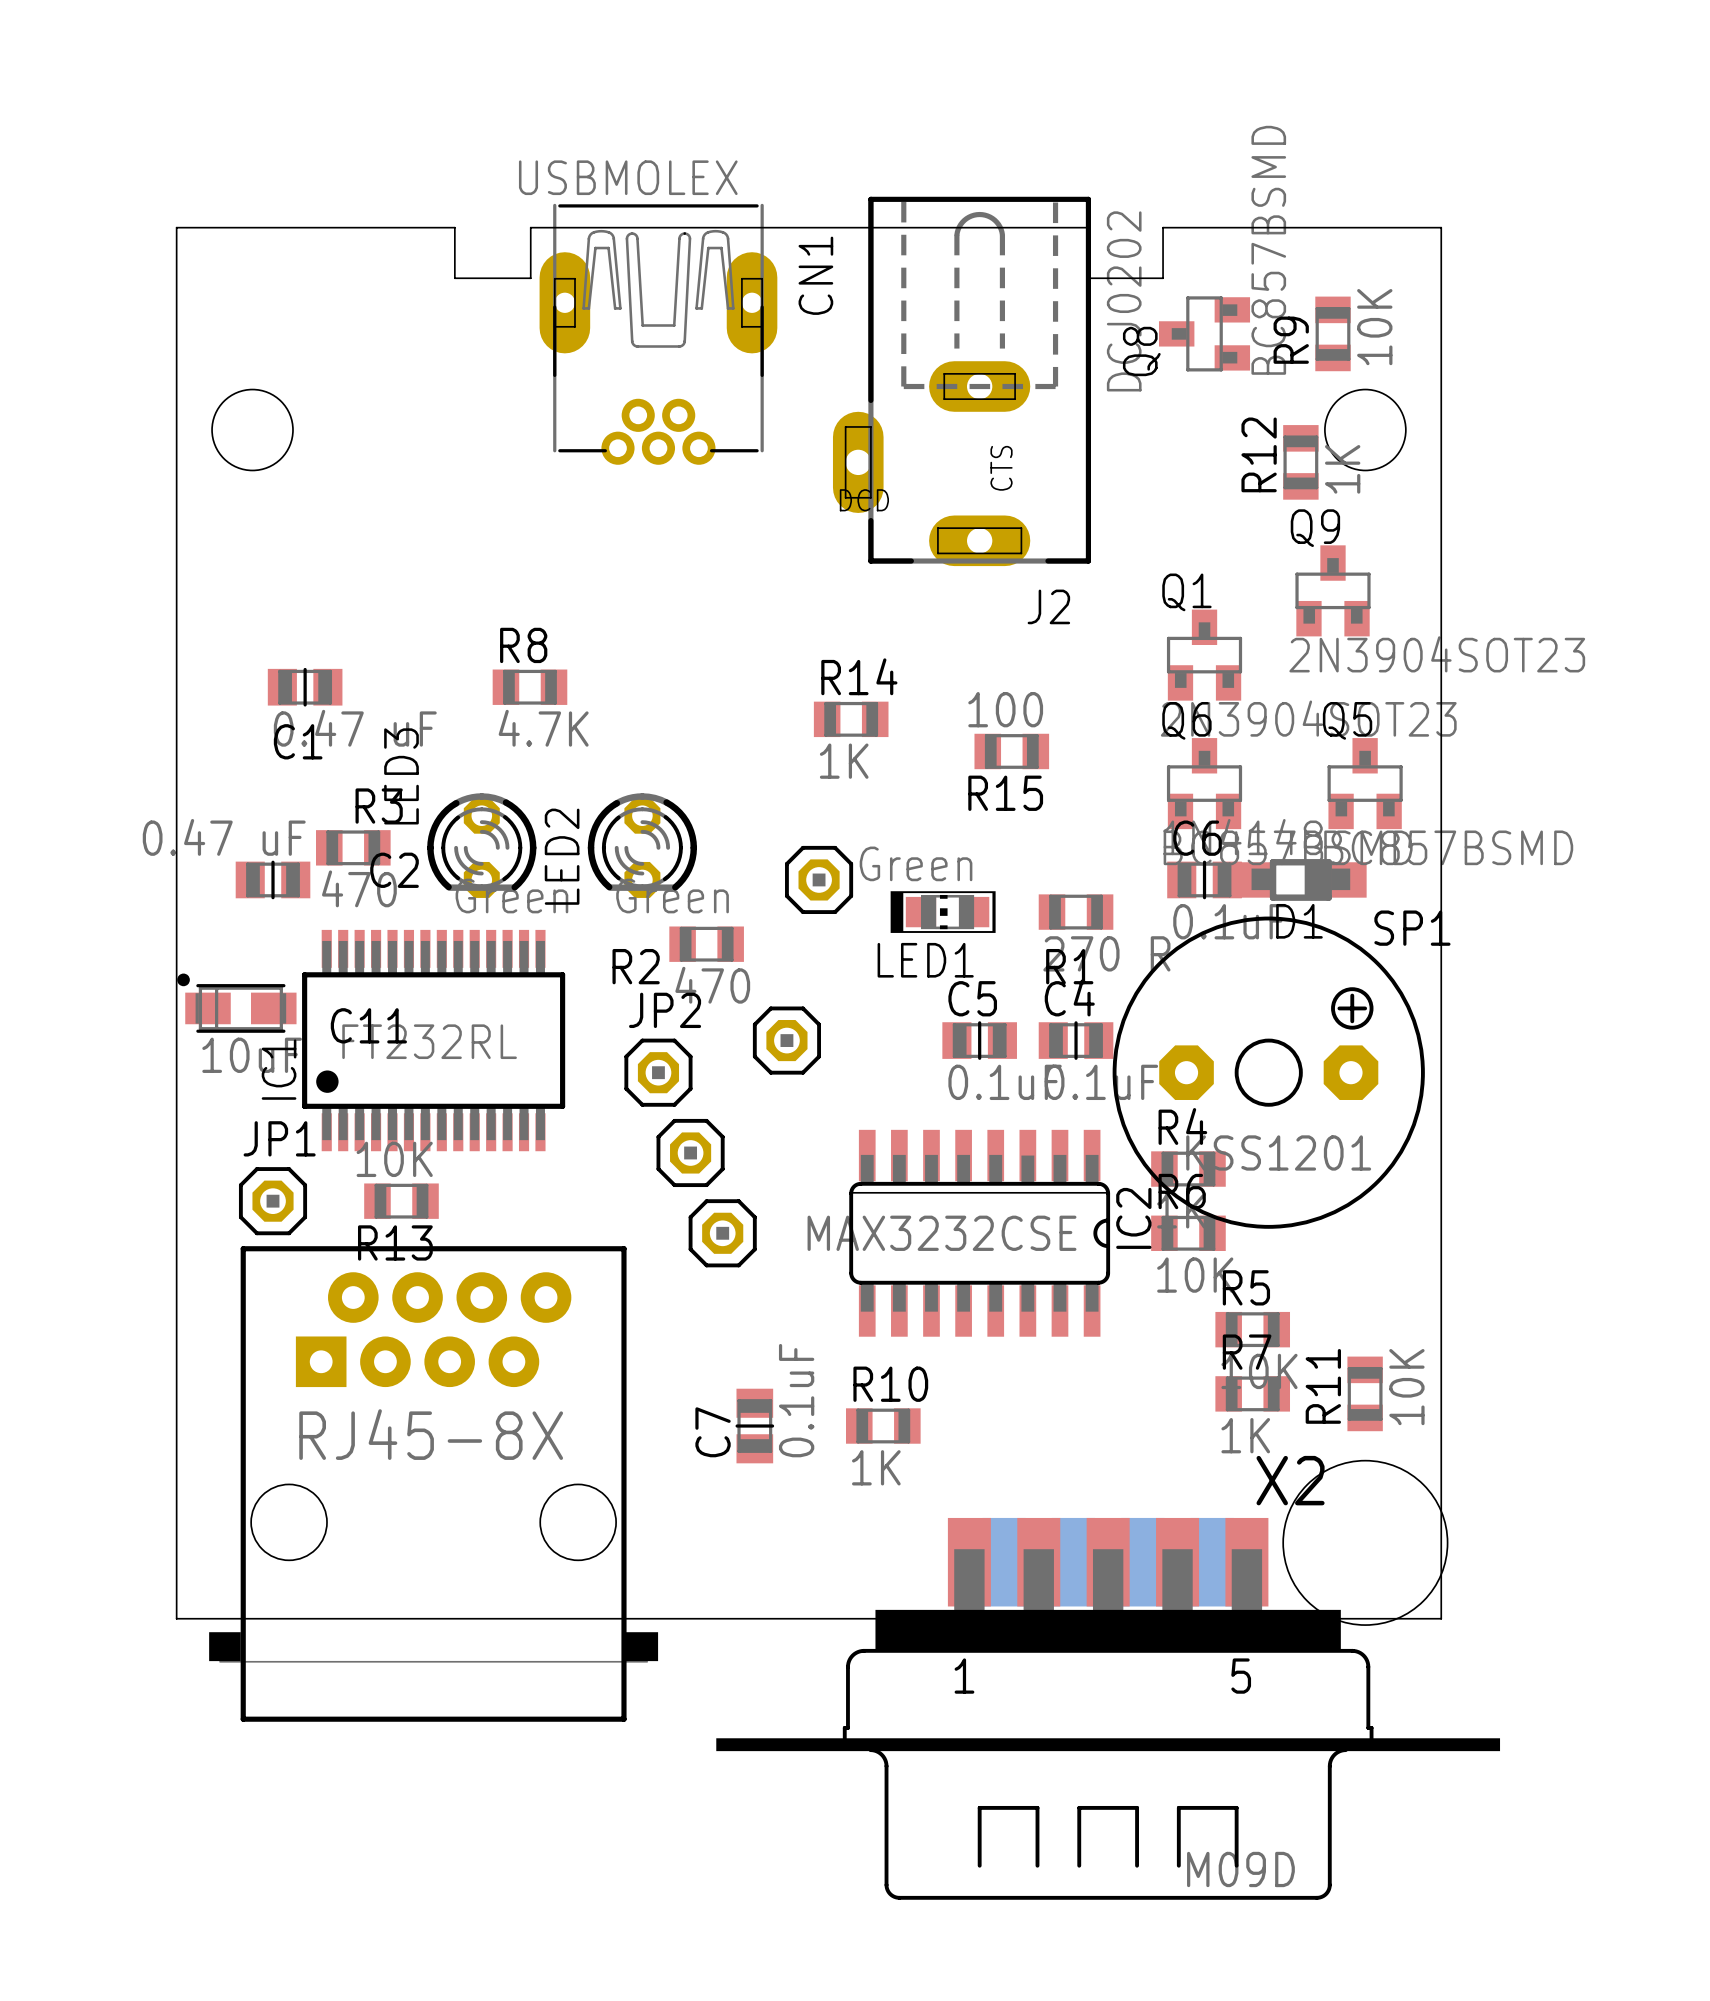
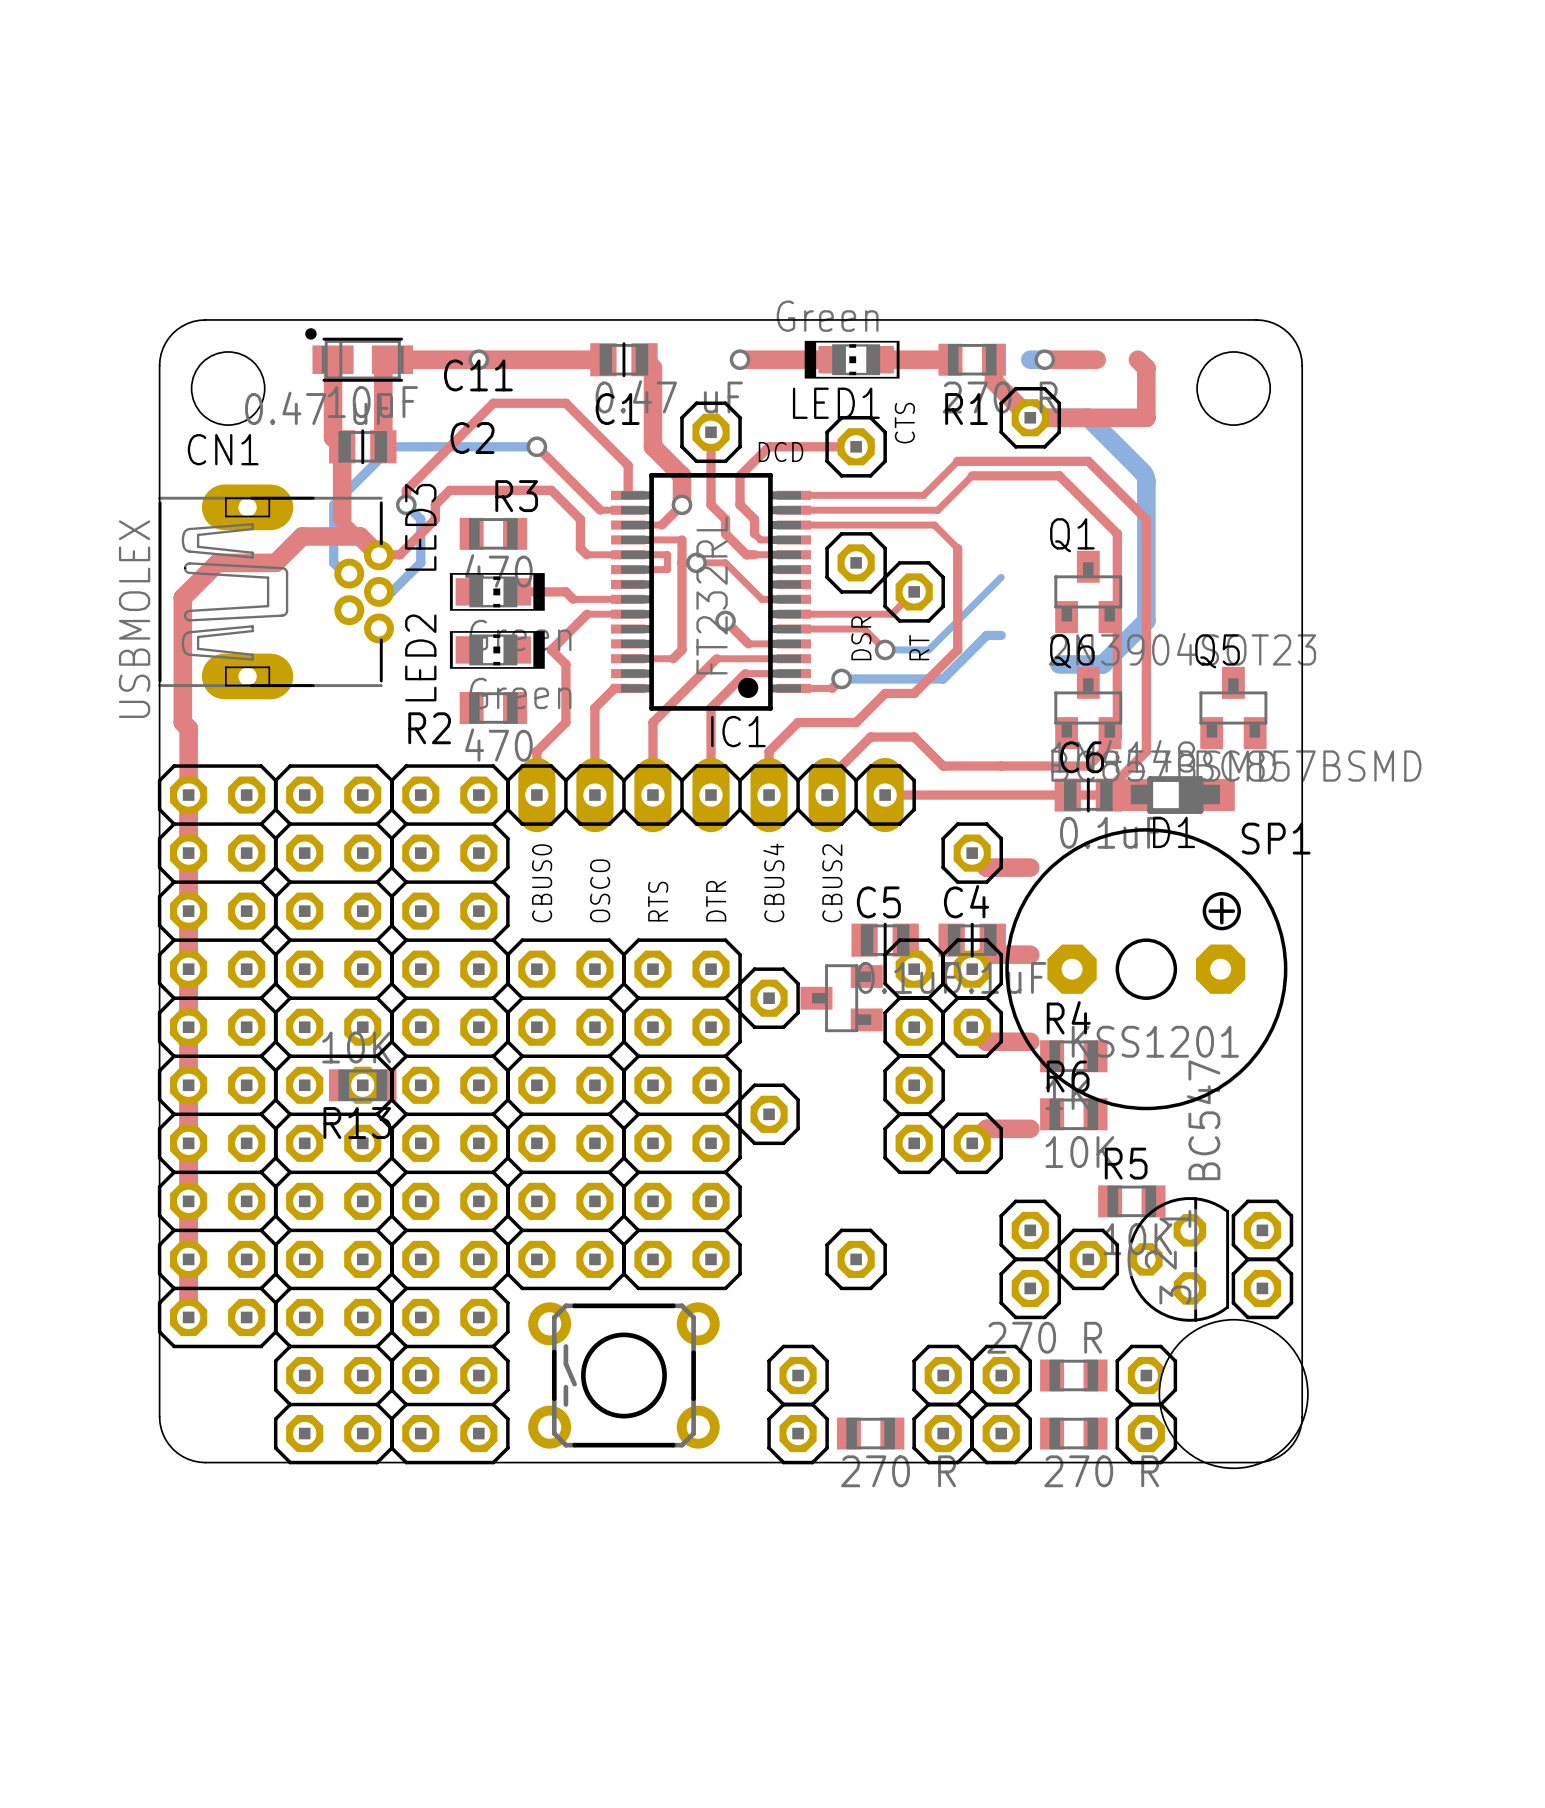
Q8: BC857BSMD (1204, 333) -> none
R9: 10K (1333, 333) -> none
CN1 rotation: 0° (658, 334) -> 90° counterclockwise (276, 591)
CN1 position: (658, 334) -> (276, 591)
J2: DCJ0202 (961, 381) -> none
top track: none -> (333, 359) (333, 437) (342, 446) (342, 518) (360, 536)
via: none -> (478, 359)
top track: none -> (603, 359) (392, 359) (383, 368) (383, 446)
top track: none -> (652, 359) (644, 359) (652, 368) (652, 446) (681, 475) (681, 504) (661, 525) (628, 525)
top track: none -> (740, 359) (832, 359)
via: none -> (740, 359)
top track: none -> (880, 359) (950, 359)
top track: none -> (993, 359) (993, 381) (1030, 417) (1146, 417) (1146, 368) (1137, 359)
bottom track: none -> (1030, 359) (1044, 359)
top track: none -> (1044, 359) (1096, 359)
via: none -> (1044, 359)
board edge: (176, 404) (176, 227) (454, 227) (454, 278) (530, 278) (530, 227) (1087, 227) (1087, 278) (1163, 278) (1163, 227) (1441, 227) (1441, 404) -> (159, 365) (163, 348) (172, 333) (187, 323) (205, 319) (1256, 319) (1273, 323) (1288, 333) (1298, 348) (1302, 365)
bottom track: none -> (1030, 417) (1088, 417) (1142, 471) (1146, 479) (1146, 620) (1102, 664) (1059, 664)
part: none -> (1030, 417)
R12: 1K (1300, 462) -> none
top track: none -> (711, 432) (711, 504) (725, 519) (725, 533) (746, 554) (793, 554)
part: none -> (711, 432)
bottom track: none -> (536, 446) (391, 446) (333, 504) (333, 562) (344, 573) (349, 573)
top track: none -> (536, 446) (600, 510) (628, 510)
via: none -> (536, 446)
part: none -> (856, 446)
top track: none -> (870, 446) (769, 446) (740, 475) (740, 504) (754, 519) (754, 533) (760, 539) (793, 539)
top track: none -> (628, 495) (628, 465) (565, 403) (493, 403) (406, 490) (406, 504)
top track: none -> (793, 495) (923, 495) (957, 461) (1088, 461) (1146, 519) (1146, 751) (1102, 795) (885, 795)
bottom track: none -> (406, 504) (420, 519) (420, 562) (391, 591) (378, 591)
via: none -> (406, 504)
via: none -> (681, 504)
top track: none -> (793, 510) (937, 510) (972, 475) (1059, 475) (1117, 533) (1117, 737) (1088, 766) (943, 766) (914, 737) (870, 737) (827, 780) (827, 795)
top track: none -> (793, 525) (934, 525) (957, 548) (957, 649) (914, 693) (885, 693) (856, 722) (798, 722) (769, 751) (769, 795)
Q9: 2N3904SOT23 (1333, 590) -> none
top track: none -> (360, 536) (378, 555) (399, 554) (435, 519) (435, 504) (449, 490) (551, 490) (580, 519) (580, 548) (586, 554) (667, 554) (667, 569) (628, 569)
top track: none -> (360, 536) (302, 536) (275, 562) (217, 562) (182, 597) (182, 722) (188, 728) (188, 1317)
top track: none -> (628, 539) (681, 539) (681, 649) (673, 658) (628, 658)
top track: none -> (681, 562) (725, 562) (761, 599) (793, 599)
via: none -> (696, 562)
part: none -> (856, 562)
bottom track: none -> (1001, 577) (928, 649) (885, 649)
top track: none -> (517, 591) (565, 591) (573, 599) (628, 599)
top track: none -> (914, 591) (891, 614) (793, 614)
part: none -> (914, 591)
top track: none -> (628, 614) (587, 614) (551, 649) (565, 664) (565, 722) (536, 751) (536, 795)
C1 position: (305, 687) -> (623, 359)
R8: 4.7K (529, 687) -> none
top track: none -> (725, 620) (748, 643) (793, 643)
via: none -> (725, 620)
top track: none -> (793, 629) (864, 629) (885, 649)
bottom track: none -> (1001, 635) (986, 635) (943, 678) (841, 678)
text: none -> DSR (861, 638)
text: none -> RT (919, 647)
R14: 1K (851, 719) -> none
via: none -> (885, 649)
top track: none -> (793, 658) (716, 658) (652, 722) (652, 795)
top track: none -> (793, 673) (745, 673) (711, 707) (711, 795)
top track: none -> (841, 678) (832, 688) (793, 688)
via: none -> (841, 678)
R15: 100 (1011, 751) -> none
top track: none -> (628, 688) (614, 688) (594, 707) (594, 795)
LED3 footprint: [427, 793, 537, 898] -> [449, 573, 545, 611]
LED2 footprint: [587, 793, 698, 898] -> [449, 631, 545, 669]
R3 position: (353, 847) -> (493, 533)
C2 position: (273, 879) -> (362, 446)
part: none -> (711, 795)
part: (819, 879) -> none
LED1 position: (943, 912) -> (852, 359)
R1 position: (1076, 912) -> (972, 359)
R2 position: (706, 944) -> (493, 707)
top track: none -> (972, 853) (986, 867) (1030, 867)
part: none -> (972, 853)
text: none -> CBUS0 (542, 883)
text: none -> CBUS4 (773, 882)
text: none -> CBUS2 (832, 883)
text: none -> OSCO (600, 890)
text: none -> RTS (658, 901)
text: none -> DTR (716, 901)
C11 position: (236, 1003) -> (359, 354)
IC1 rotation: 0° (433, 1040) -> 90° counterclockwise (711, 591)
IC1 position: (433, 1040) -> (711, 591)
part: (786, 1040) -> none
top track: none -> (1030, 954) (986, 954) (972, 969)
JP2: (658, 1072) -> none
part: none -> (914, 969)
part: none -> (972, 969)
part: none -> (769, 998)
part: none -> (841, 998)
part: none -> (914, 1027)
top track: none -> (972, 1027) (986, 1041) (1030, 1041)
part: none -> (972, 1027)
part: (690, 1152) -> none
part: none -> (217, 1056)
JP1: (273, 1201) -> none
part: none -> (914, 1085)
part: none -> (333, 1114)
part: none -> (449, 1114)
part: none -> (565, 1114)
part: (722, 1233) -> none
part: none -> (681, 1114)
part: none -> (769, 1114)
IC2: MAX3232CSE (979, 1233) -> none
top track: none -> (1030, 1128) (986, 1128) (972, 1143)
part: none -> (914, 1143)
part: none -> (972, 1143)
part: none -> (1030, 1230)
part: none -> (1262, 1230)
part: none -> (856, 1259)
part: none -> (1088, 1259)
R7: 1K (1252, 1393) -> none
part: none -> BC547 (1178, 1259)
R11: 10K (1365, 1393) -> none
C7: 0.1uF (754, 1426) -> none
R10: 1K (883, 1426) -> none
part: none -> (1030, 1288)
part: none -> (1262, 1288)
part: RJ45-8X (433, 1483) -> none
part: none -> (623, 1375)
part: none -> (798, 1375)
part: none -> (943, 1375)
part: none -> (1001, 1375)
part: none -> 270 R (1073, 1375)
part: none -> (1146, 1375)
board edge: (176, 1568) (176, 1618) (227, 1618) -> (159, 1416) (163, 1434) (172, 1449) (187, 1459) (205, 1462)
board edge: (1441, 1568) (1441, 1618) (1390, 1618) -> (1302, 1416) (1298, 1434) (1288, 1449) (1273, 1459) (1256, 1462)
part: none -> (798, 1433)
part: none -> 270 R (870, 1433)
part: none -> (943, 1433)
part: none -> (1001, 1433)
part: none -> 270 R (1073, 1433)
part: none -> (1146, 1433)
X2: (1108, 1708) -> none

